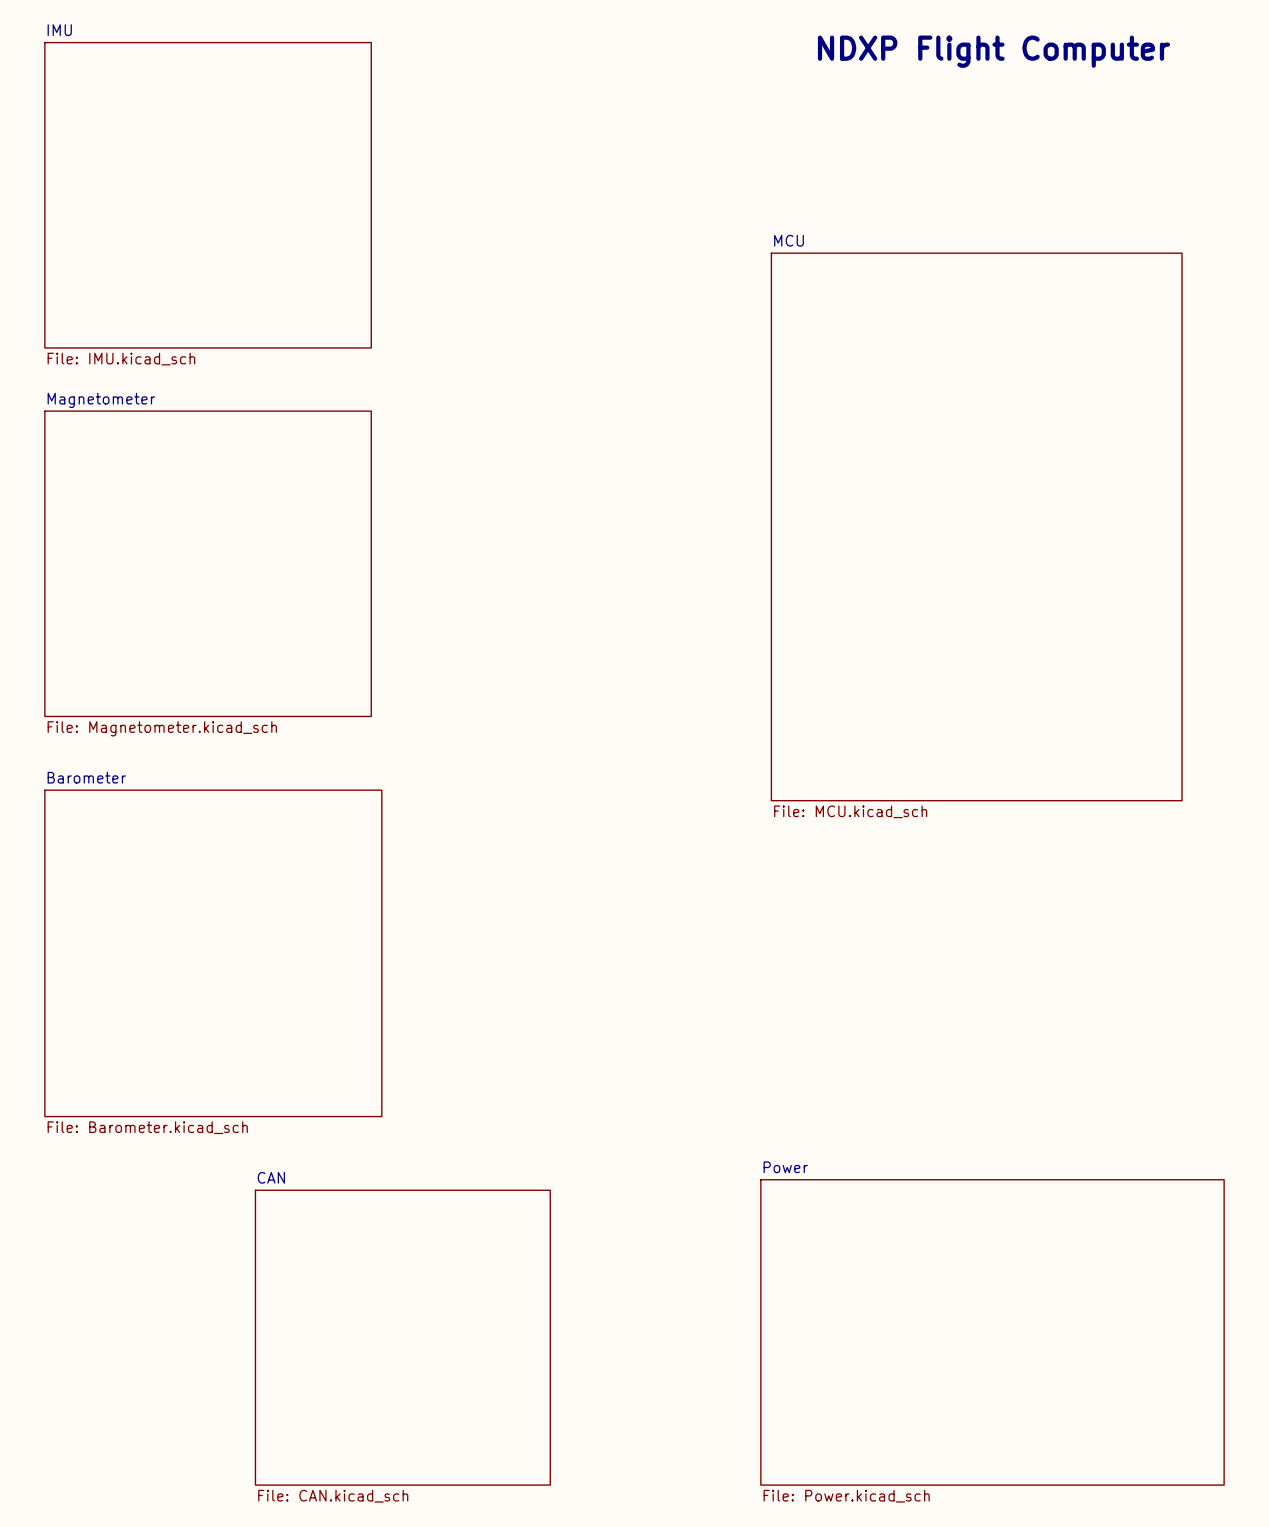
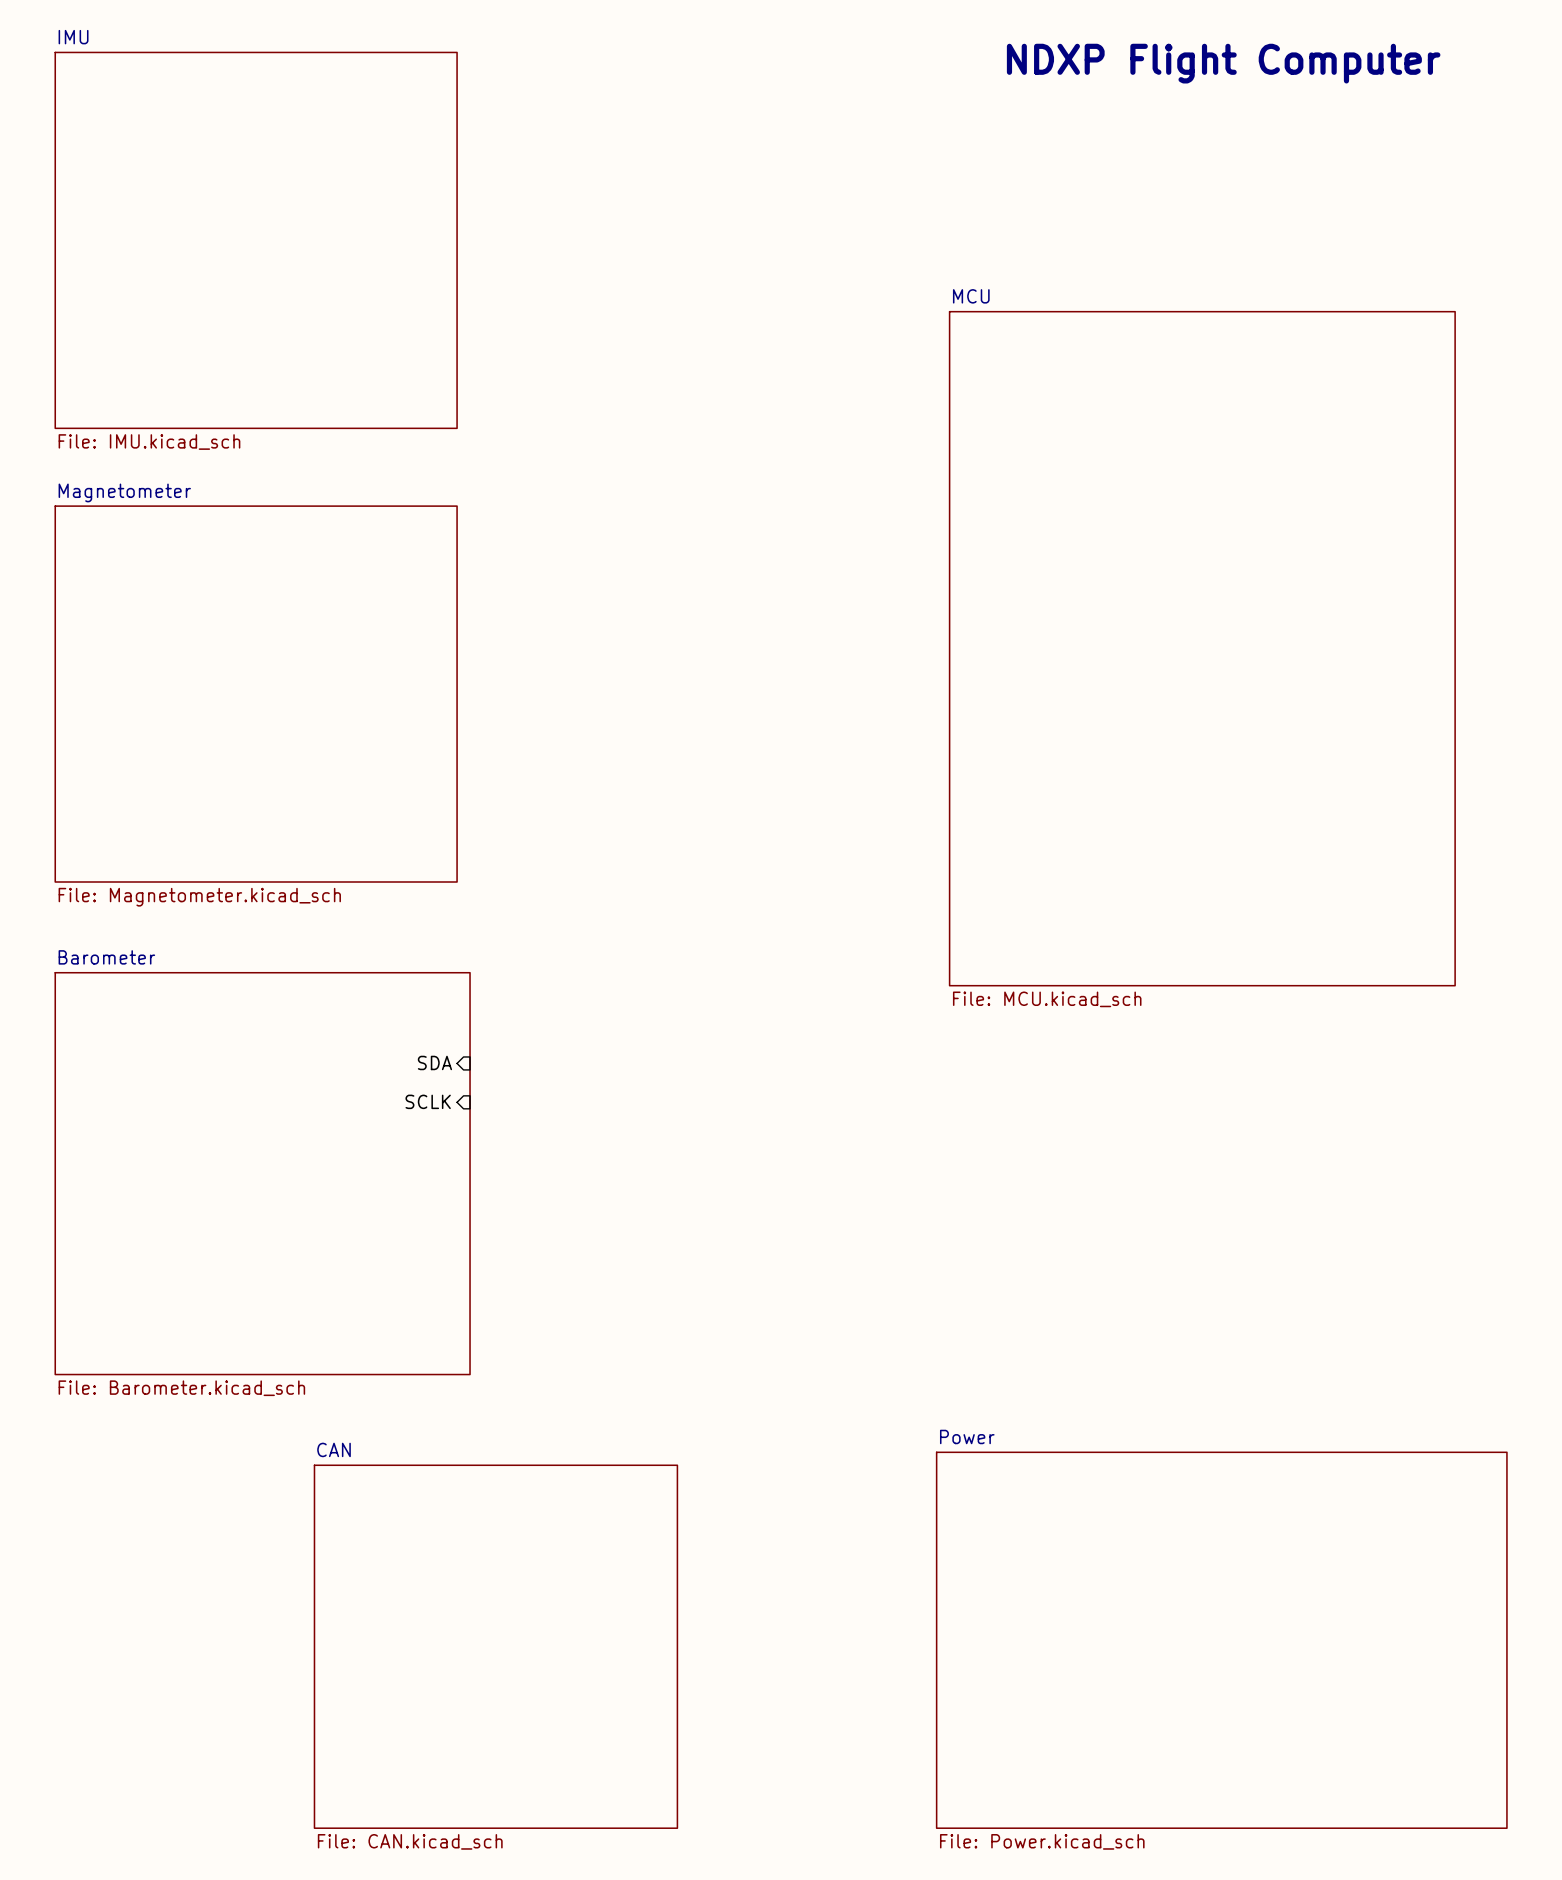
sheet pin: none -> SDA (434, 1062)
sheet pin: none -> SCLK (428, 1101)

